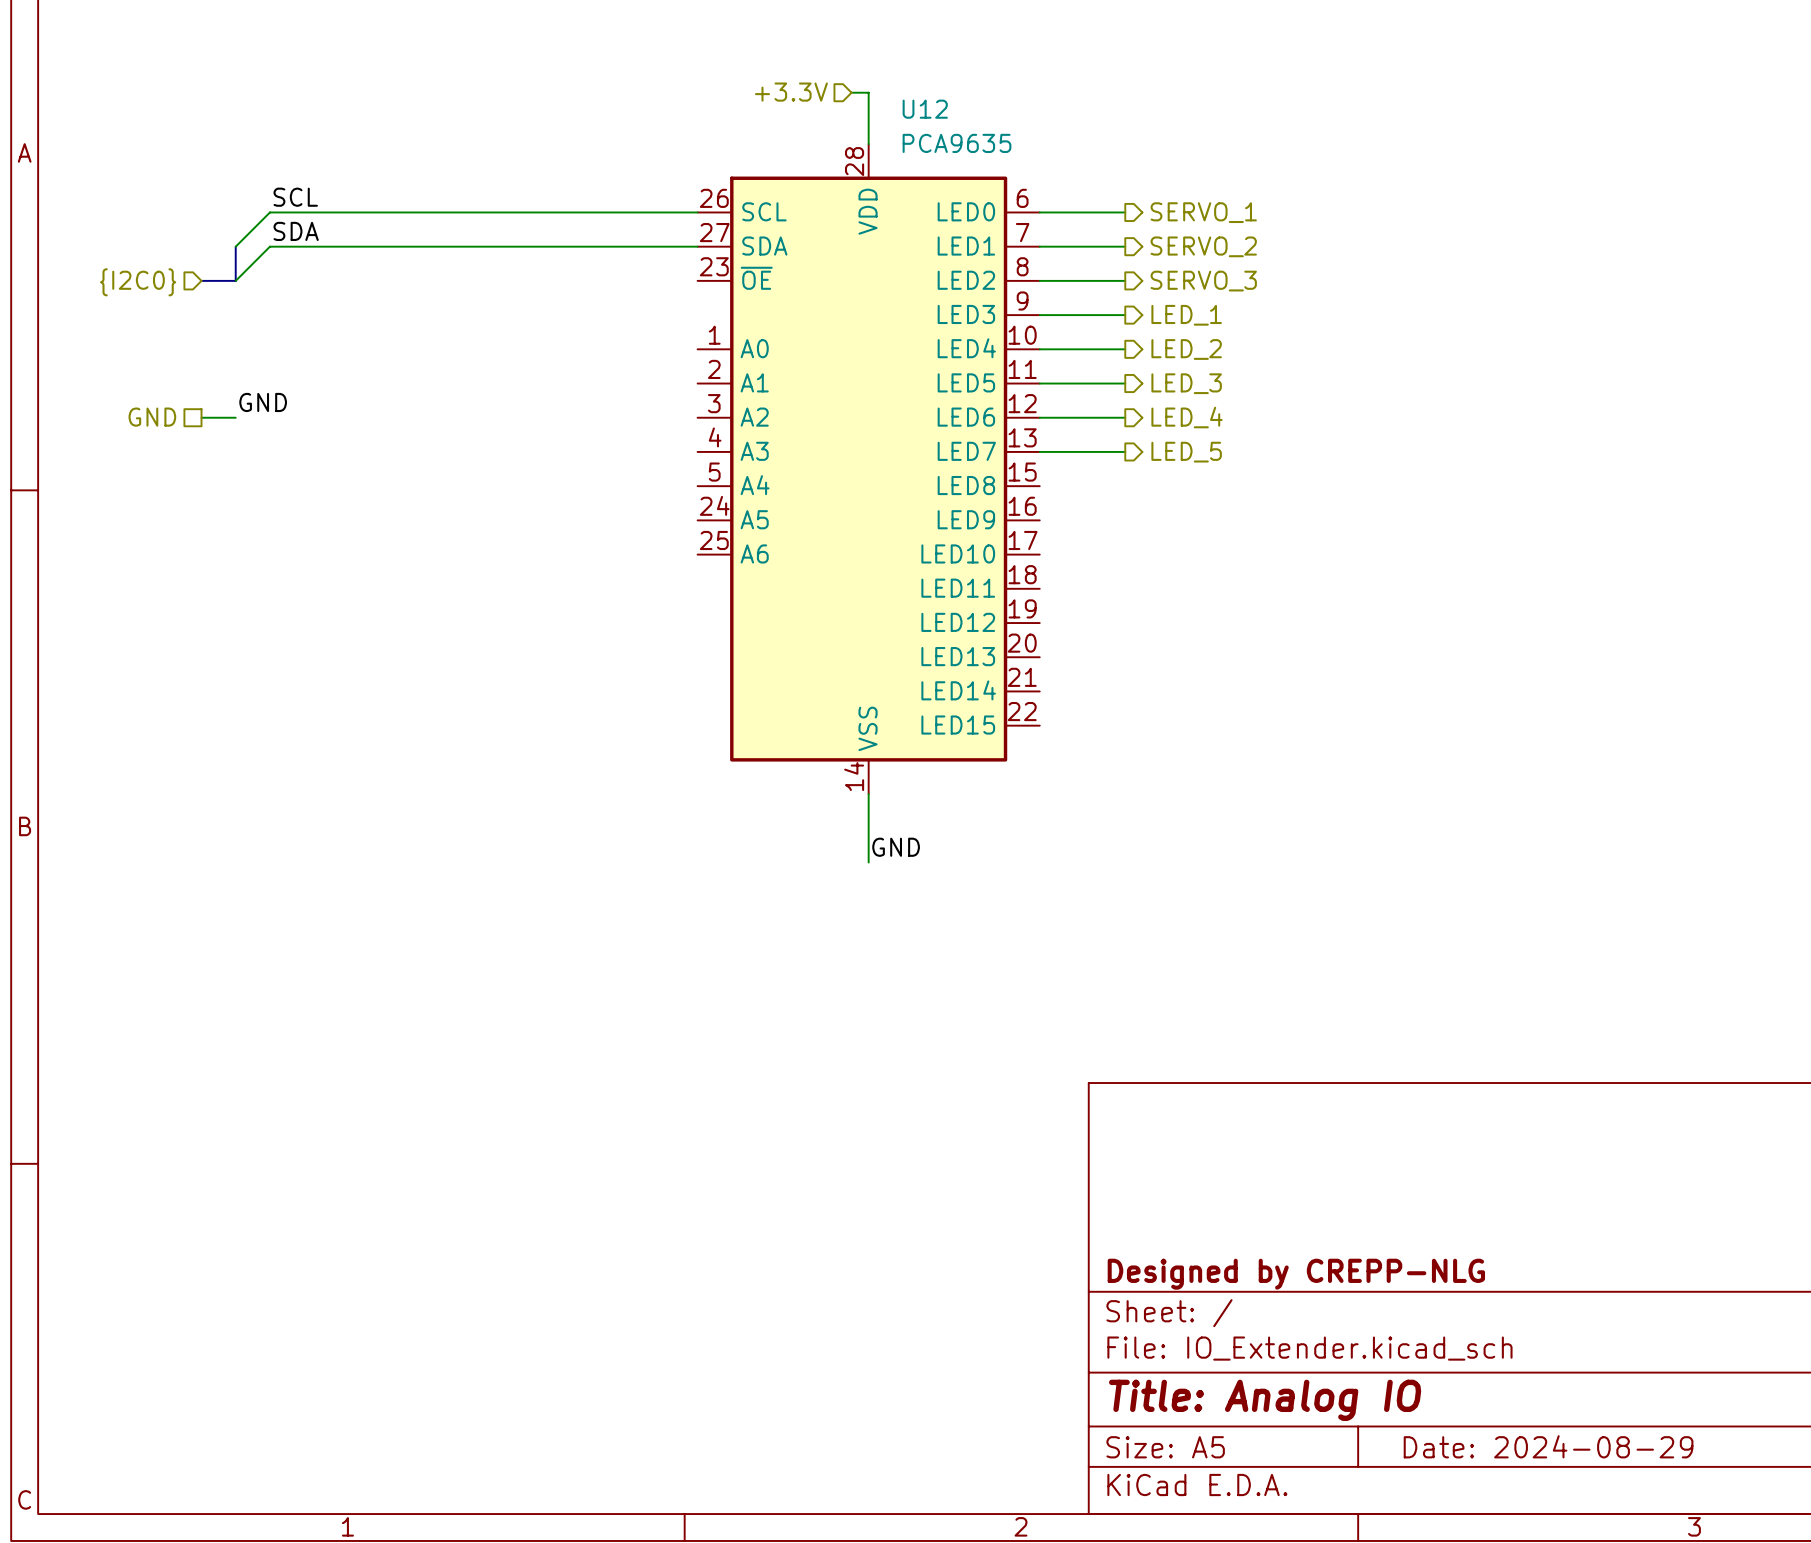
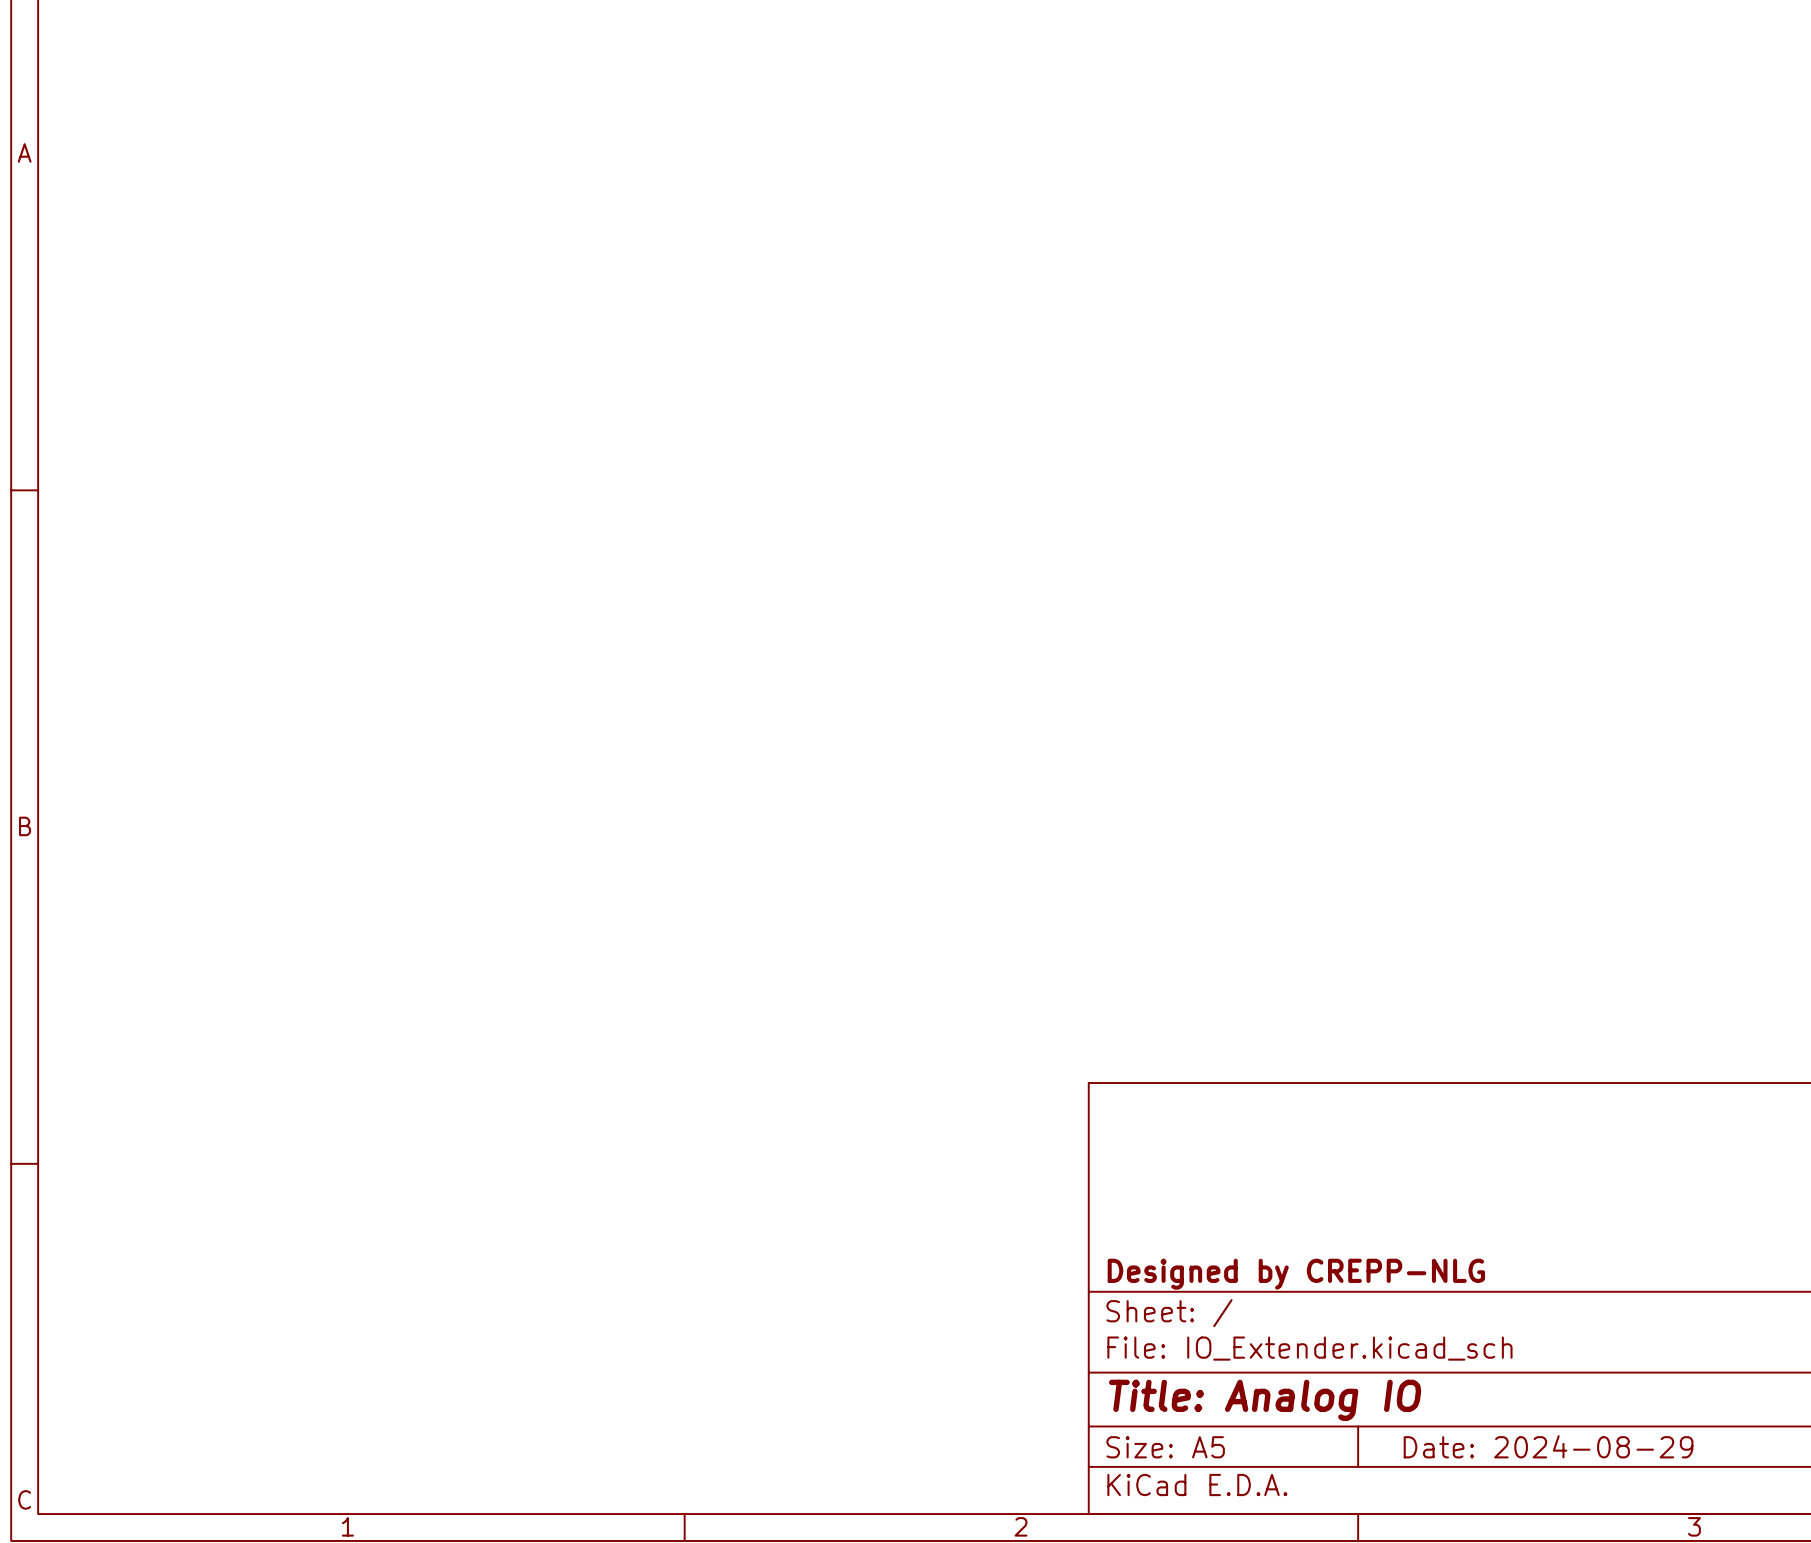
hierarchical label: +3.3V (791, 92) -> none
wire: (851, 92) (868, 92) (868, 144) -> none
label: SCL (295, 197) -> none
wire: (697, 212) (269, 212) (235, 246) -> none
wire: (1039, 212) (1125, 212) -> none
hierarchical label: SERVO_1 (1203, 212) -> none
label: SDA (296, 231) -> none
bus: (235, 246) (235, 280) (201, 280) -> none
wire: (697, 246) (269, 246) (235, 280) -> none
wire: (1039, 246) (1125, 246) -> none
hierarchical label: SERVO_2 (1203, 246) -> none
wire: (1039, 280) (1125, 280) -> none
hierarchical label: SERVO_3 (1203, 281) -> none
hierarchical label: {I2C0} (138, 282) -> none
wire: (1039, 315) (1125, 315) -> none
hierarchical label: LED_1 (1186, 315) -> none
wire: (1039, 349) (1125, 349) -> none
hierarchical label: LED_2 (1186, 349) -> none
wire: (1039, 383) (1125, 383) -> none
hierarchical label: LED_3 (1186, 383) -> none
label: GND (263, 402) -> none
hierarchical label: GND (152, 417) -> none
wire: (201, 417) (235, 417) -> none
wire: (1039, 417) (1125, 417) -> none
hierarchical label: LED_4 (1187, 417) -> none
wire: (1039, 451) (1125, 451) -> none
hierarchical label: LED_5 (1186, 452) -> none
U12: PCA9635 (868, 469) -> none
wire: (868, 794) (868, 862) -> none
label: GND (896, 847) -> none

